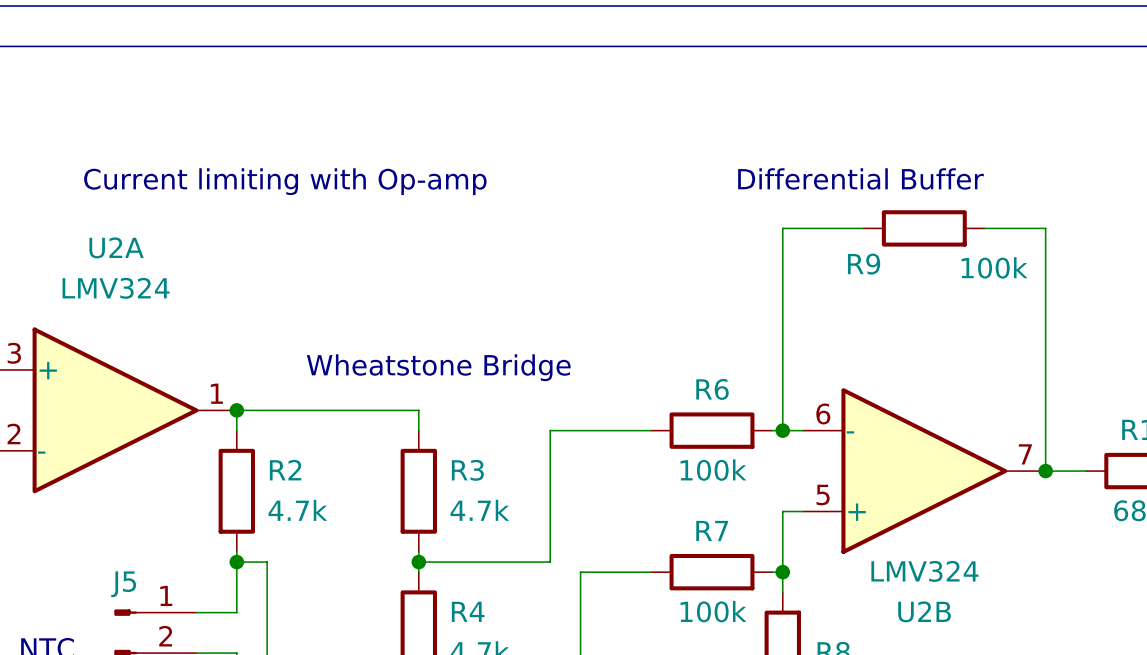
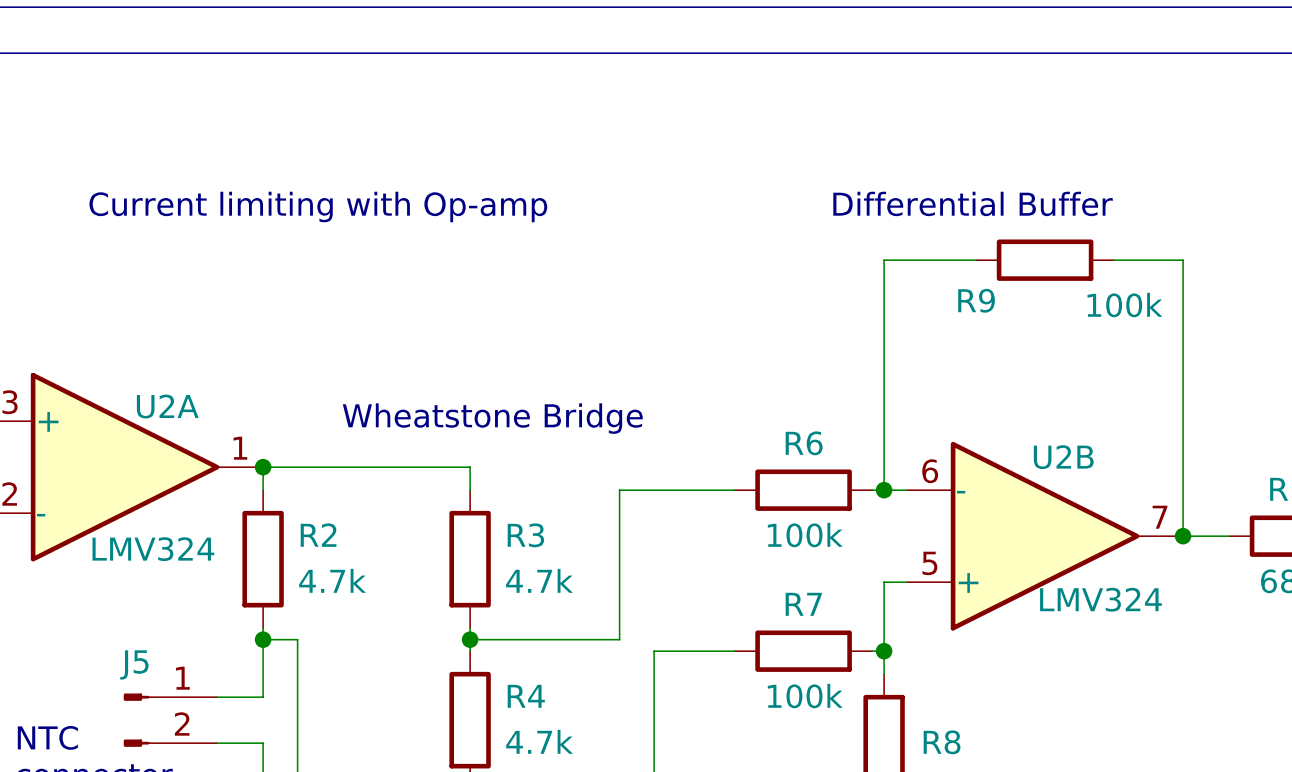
U2A name position: U2A (116, 247) -> U2A (167, 406)
U2A value position: LMV324 (116, 288) -> LMV324 (153, 549)
U2B value position: LMV324 (924, 571) -> LMV324 (1100, 599)
U2B name position: U2B (924, 611) -> U2B (1063, 457)

